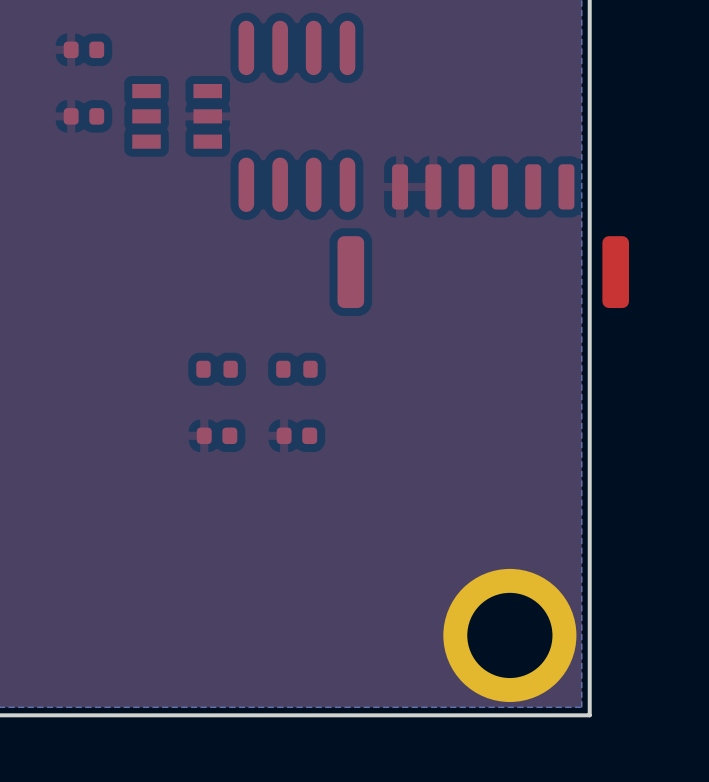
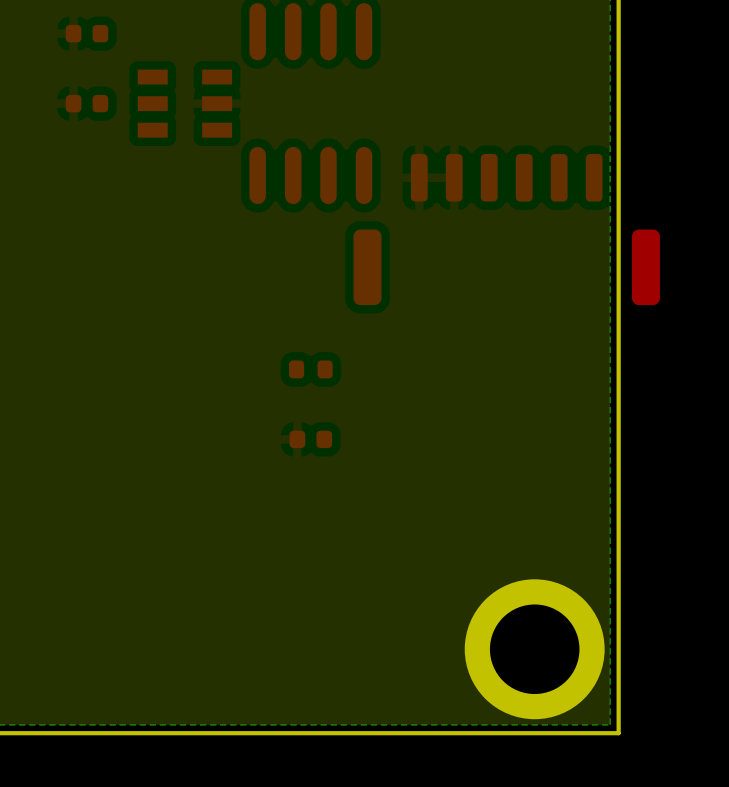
part: (217, 369) -> none
part: (217, 435) -> none

